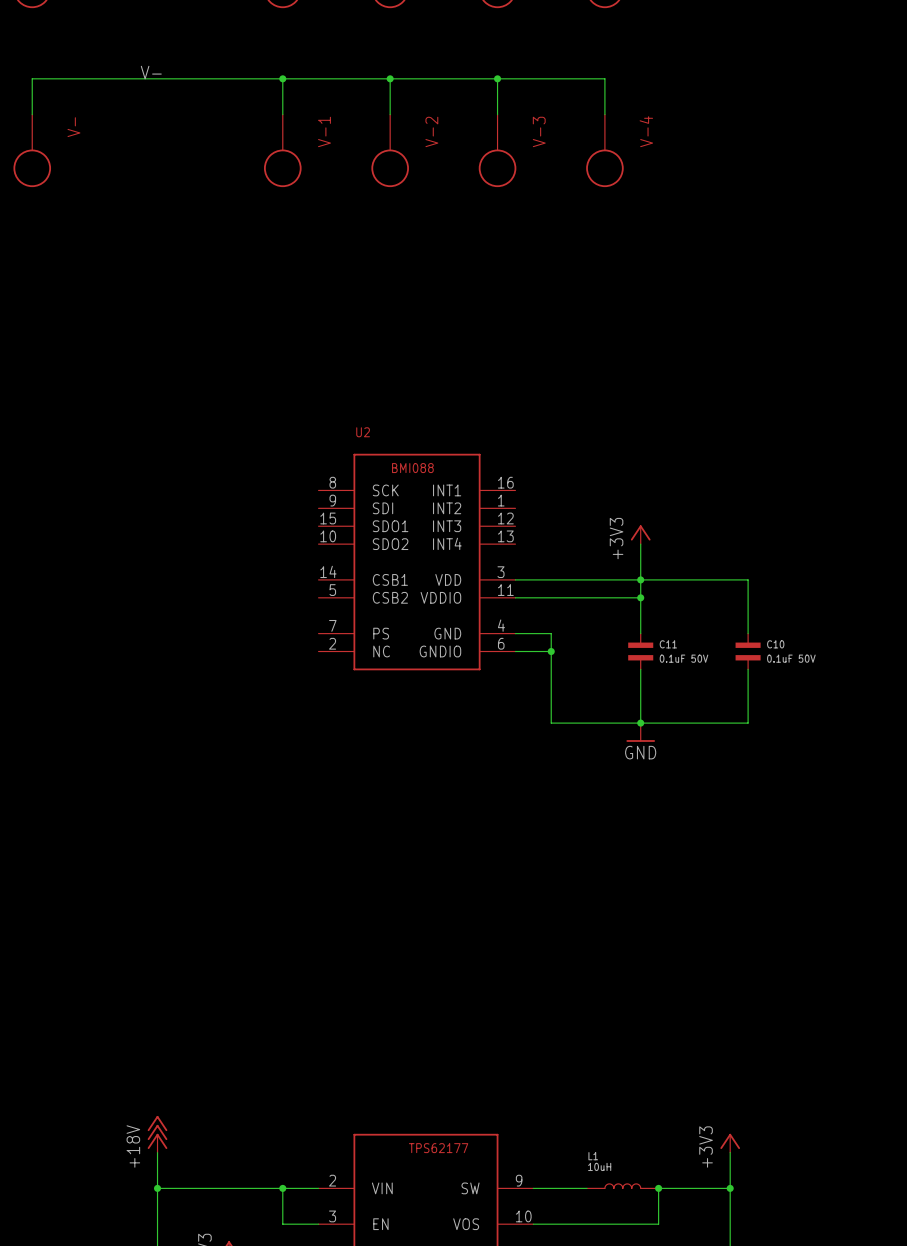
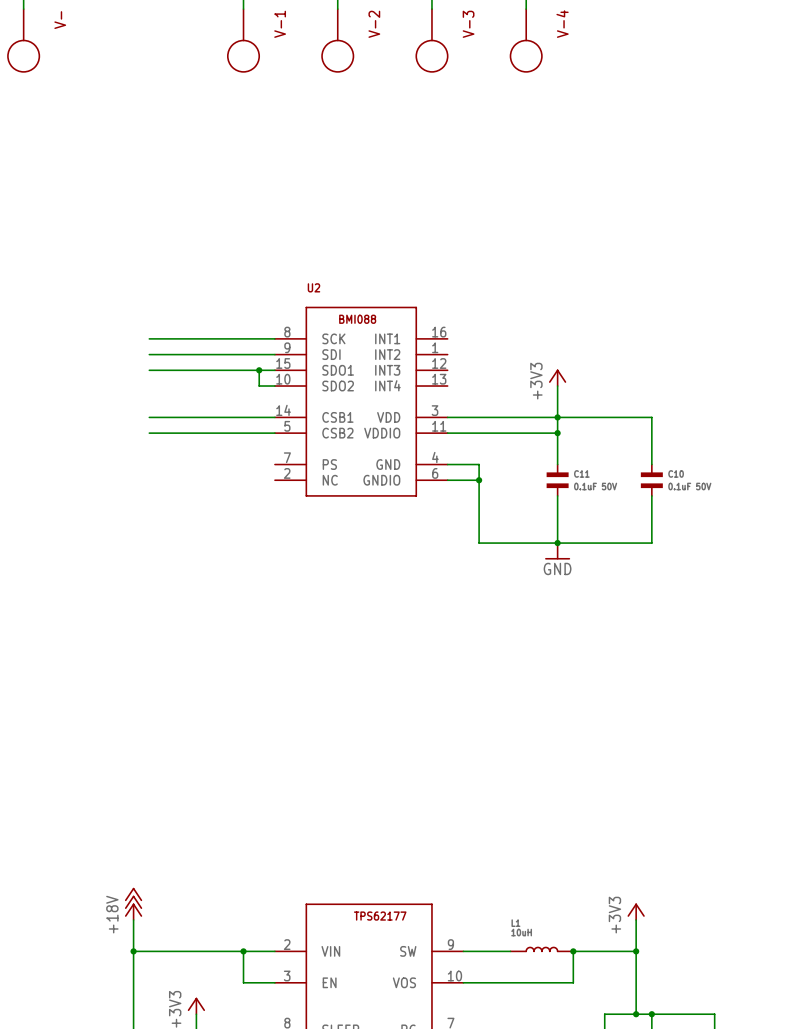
wire: none -> (149, 338) (274, 338)
wire: none -> (149, 354) (274, 354)
wire: none -> (149, 370) (274, 370)
wire: none -> (259, 370) (259, 386) (274, 386)
junction: none -> (259, 370)
wire: none -> (149, 417) (274, 417)
wire: none -> (149, 433) (274, 433)

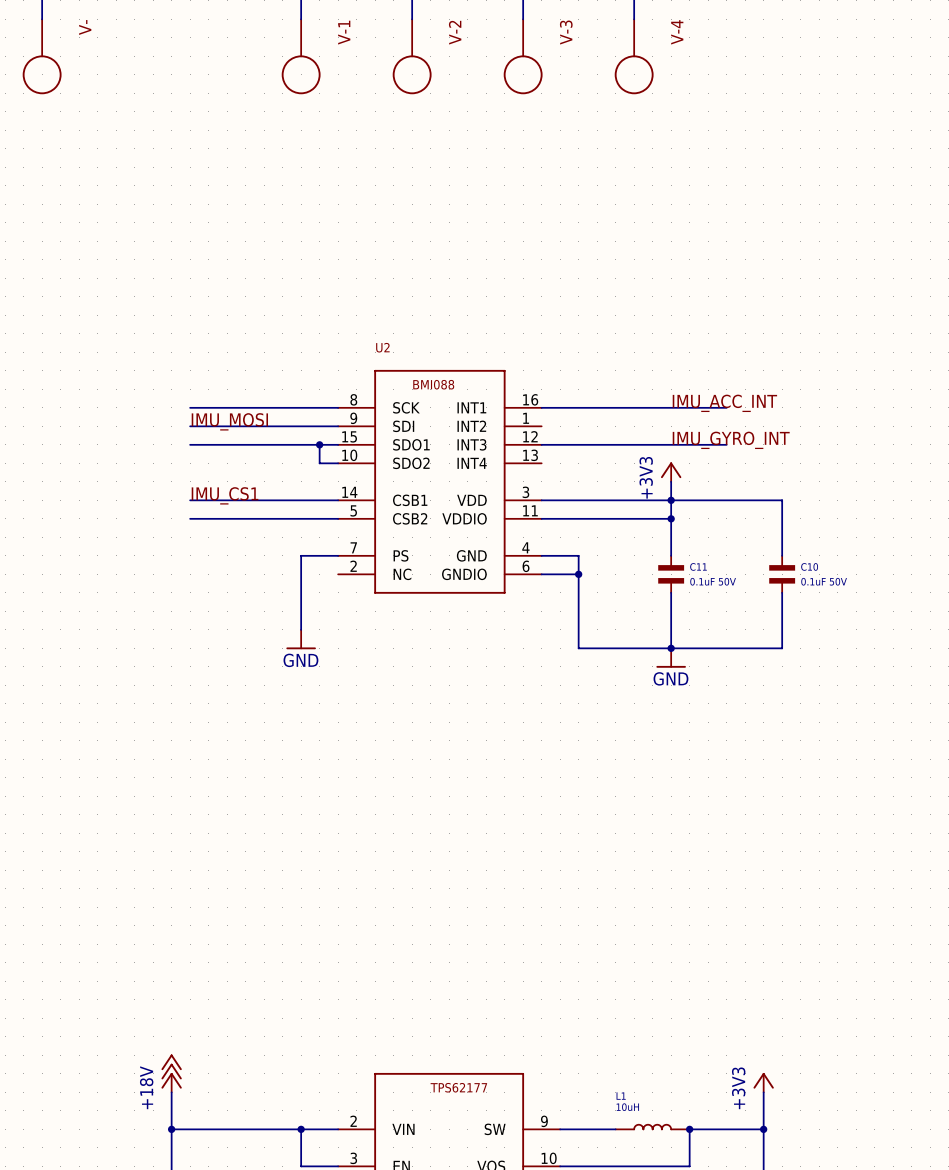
label: none -> IMU_ACC_INT (724, 403)
wire: none -> (541, 407) (726, 407)
label: none -> IMU_MOSI (229, 421)
label: none -> IMU_GYRO_INT (731, 440)
wire: none -> (541, 444) (726, 444)
power symbol position: +3V3 (557, 377) -> +3V3 (671, 472)
label: none -> IMU_CS1 (225, 495)
wire: none -> (338, 555) (301, 555) (301, 629)
power symbol: none -> GND (301, 639)

